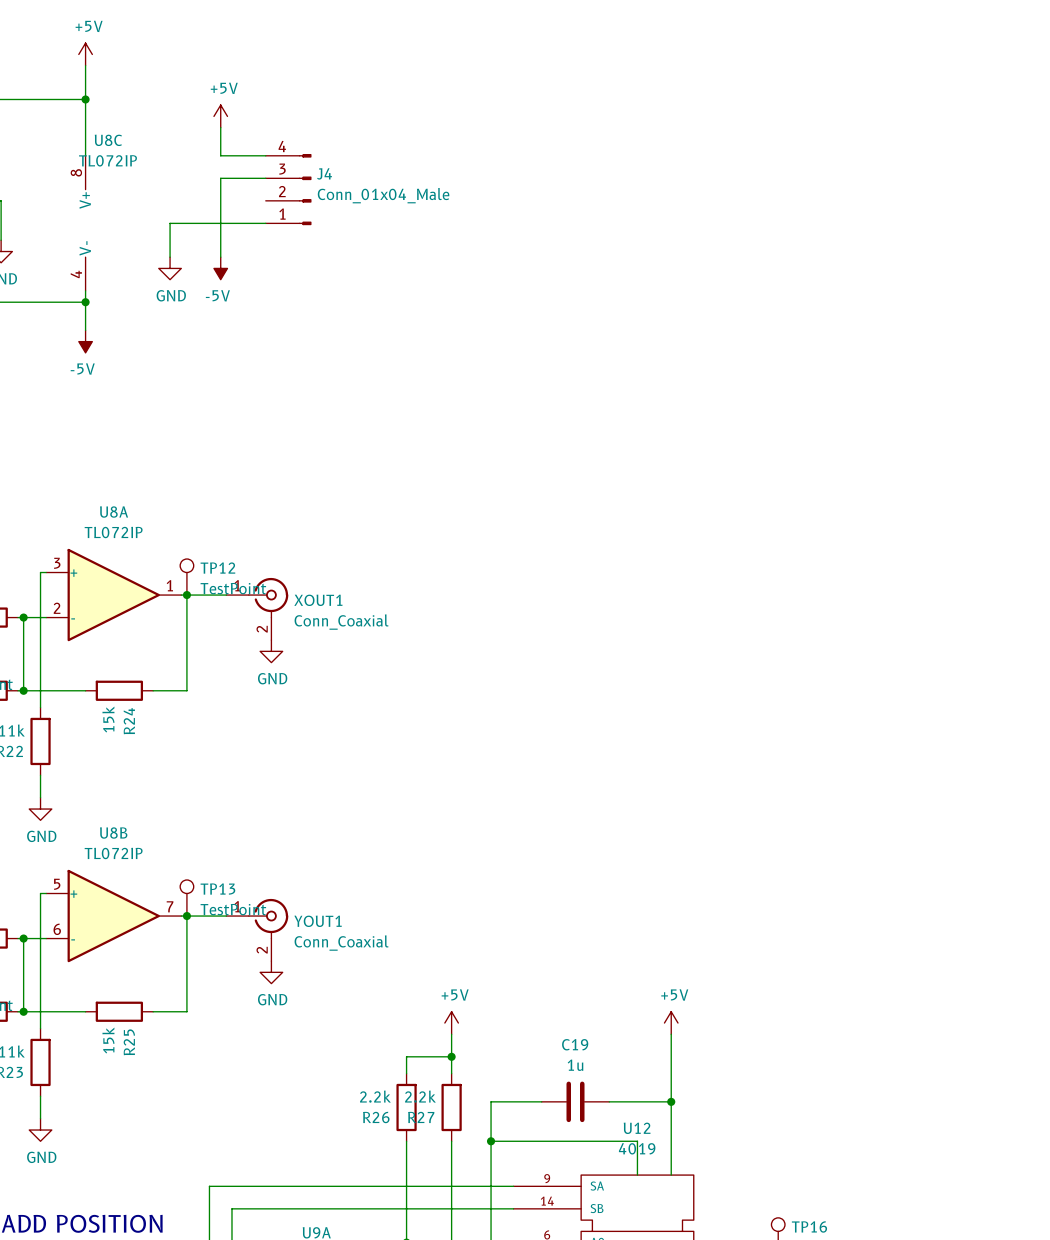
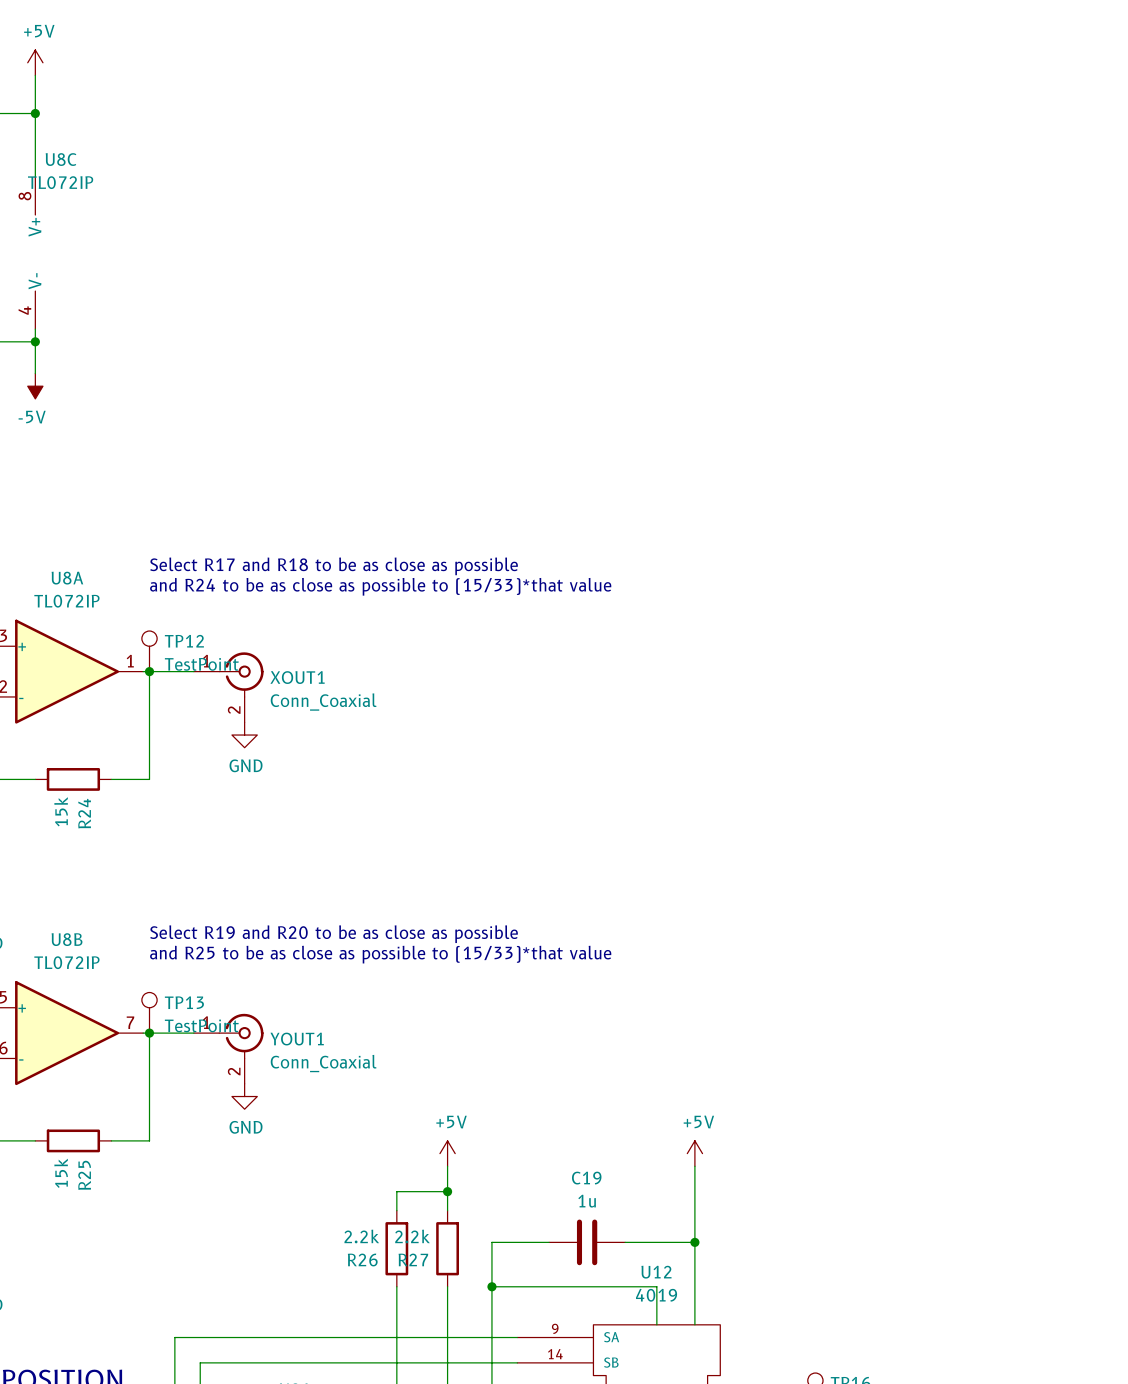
power symbol: +5V (220, 116) -> none
wire: (220, 127) (220, 155) (265, 155) -> none
wire: (265, 178) (220, 178) (220, 257) -> none
J4: Conn_01x04_Male (288, 189) -> none
wire: (265, 223) (170, 223) (170, 257) -> none
power symbol: GND (170, 268) -> none
power symbol: -5V (220, 268) -> none
text: none -> Select R17 and R18 to be as close as possible (334, 566)
text: none -> and R24 to be as close as possible to (15/33)*that value (380, 586)
text: none -> Select R19 and R20 to be as close as possible (334, 934)
text: none -> and R25 to be as close as possible to (15/33)*that value (380, 954)

